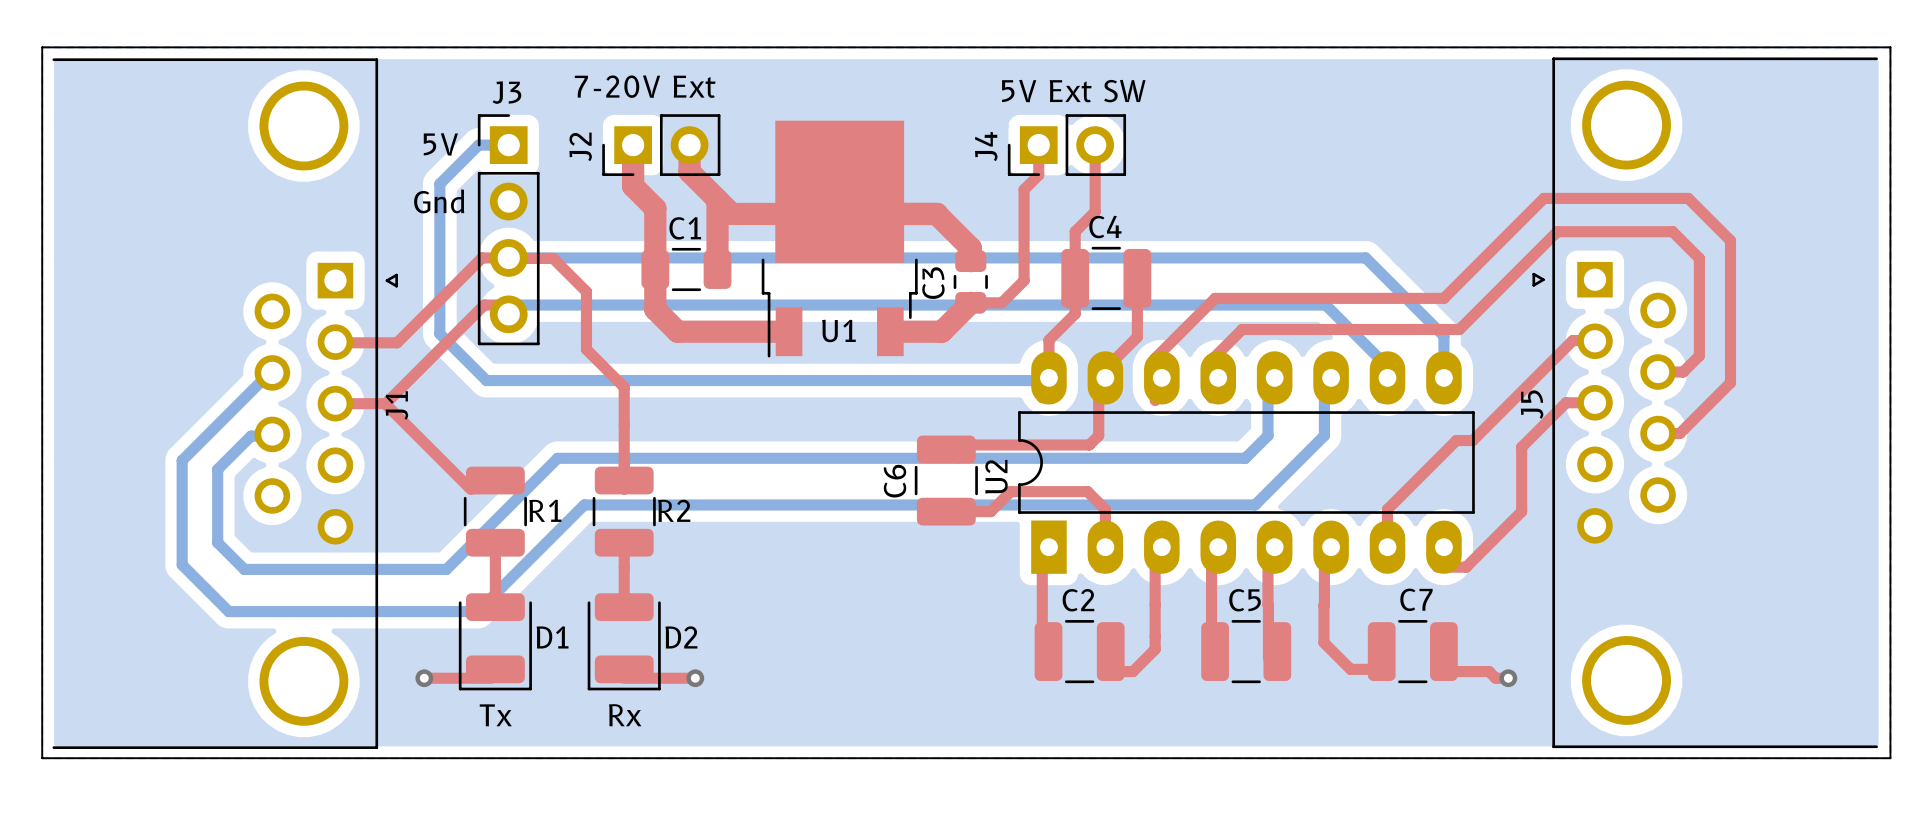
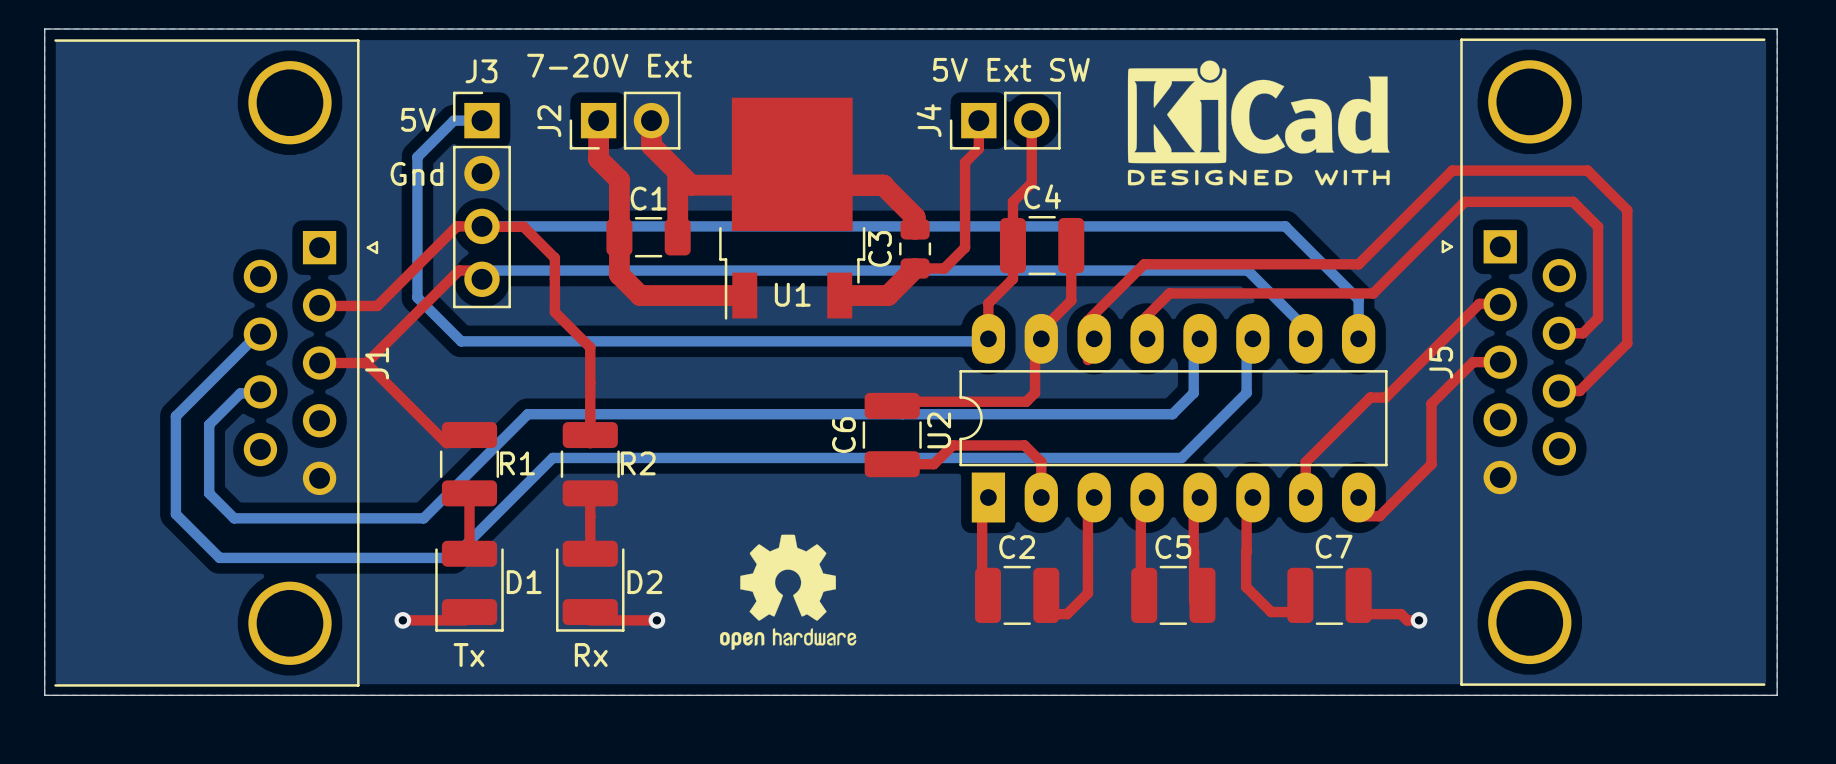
drawing: none -> [1127, 60, 1390, 186]
drawing: none -> [719, 534, 857, 651]

